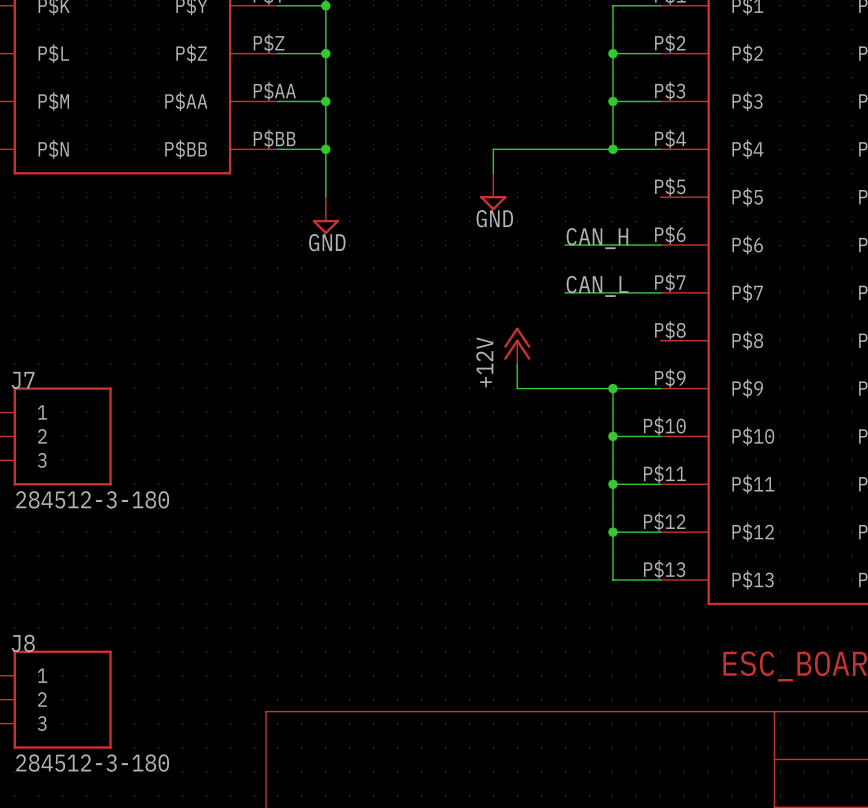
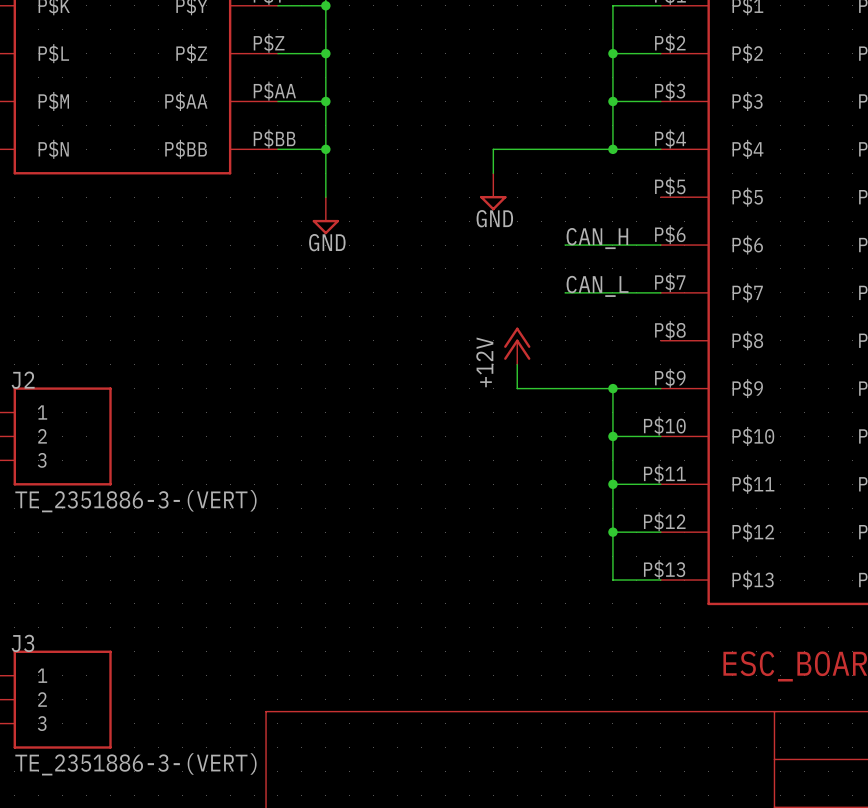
J7 name: J7 (23, 380) -> J2 (23, 380)
J7 value: 284512-3-180 (92, 499) -> TE_2351886-3-(VERT) (135, 501)
J8 name: J8 (23, 643) -> J3 (22, 643)
J8 value: 284512-3-180 (92, 763) -> TE_2351886-3-(VERT) (135, 764)

